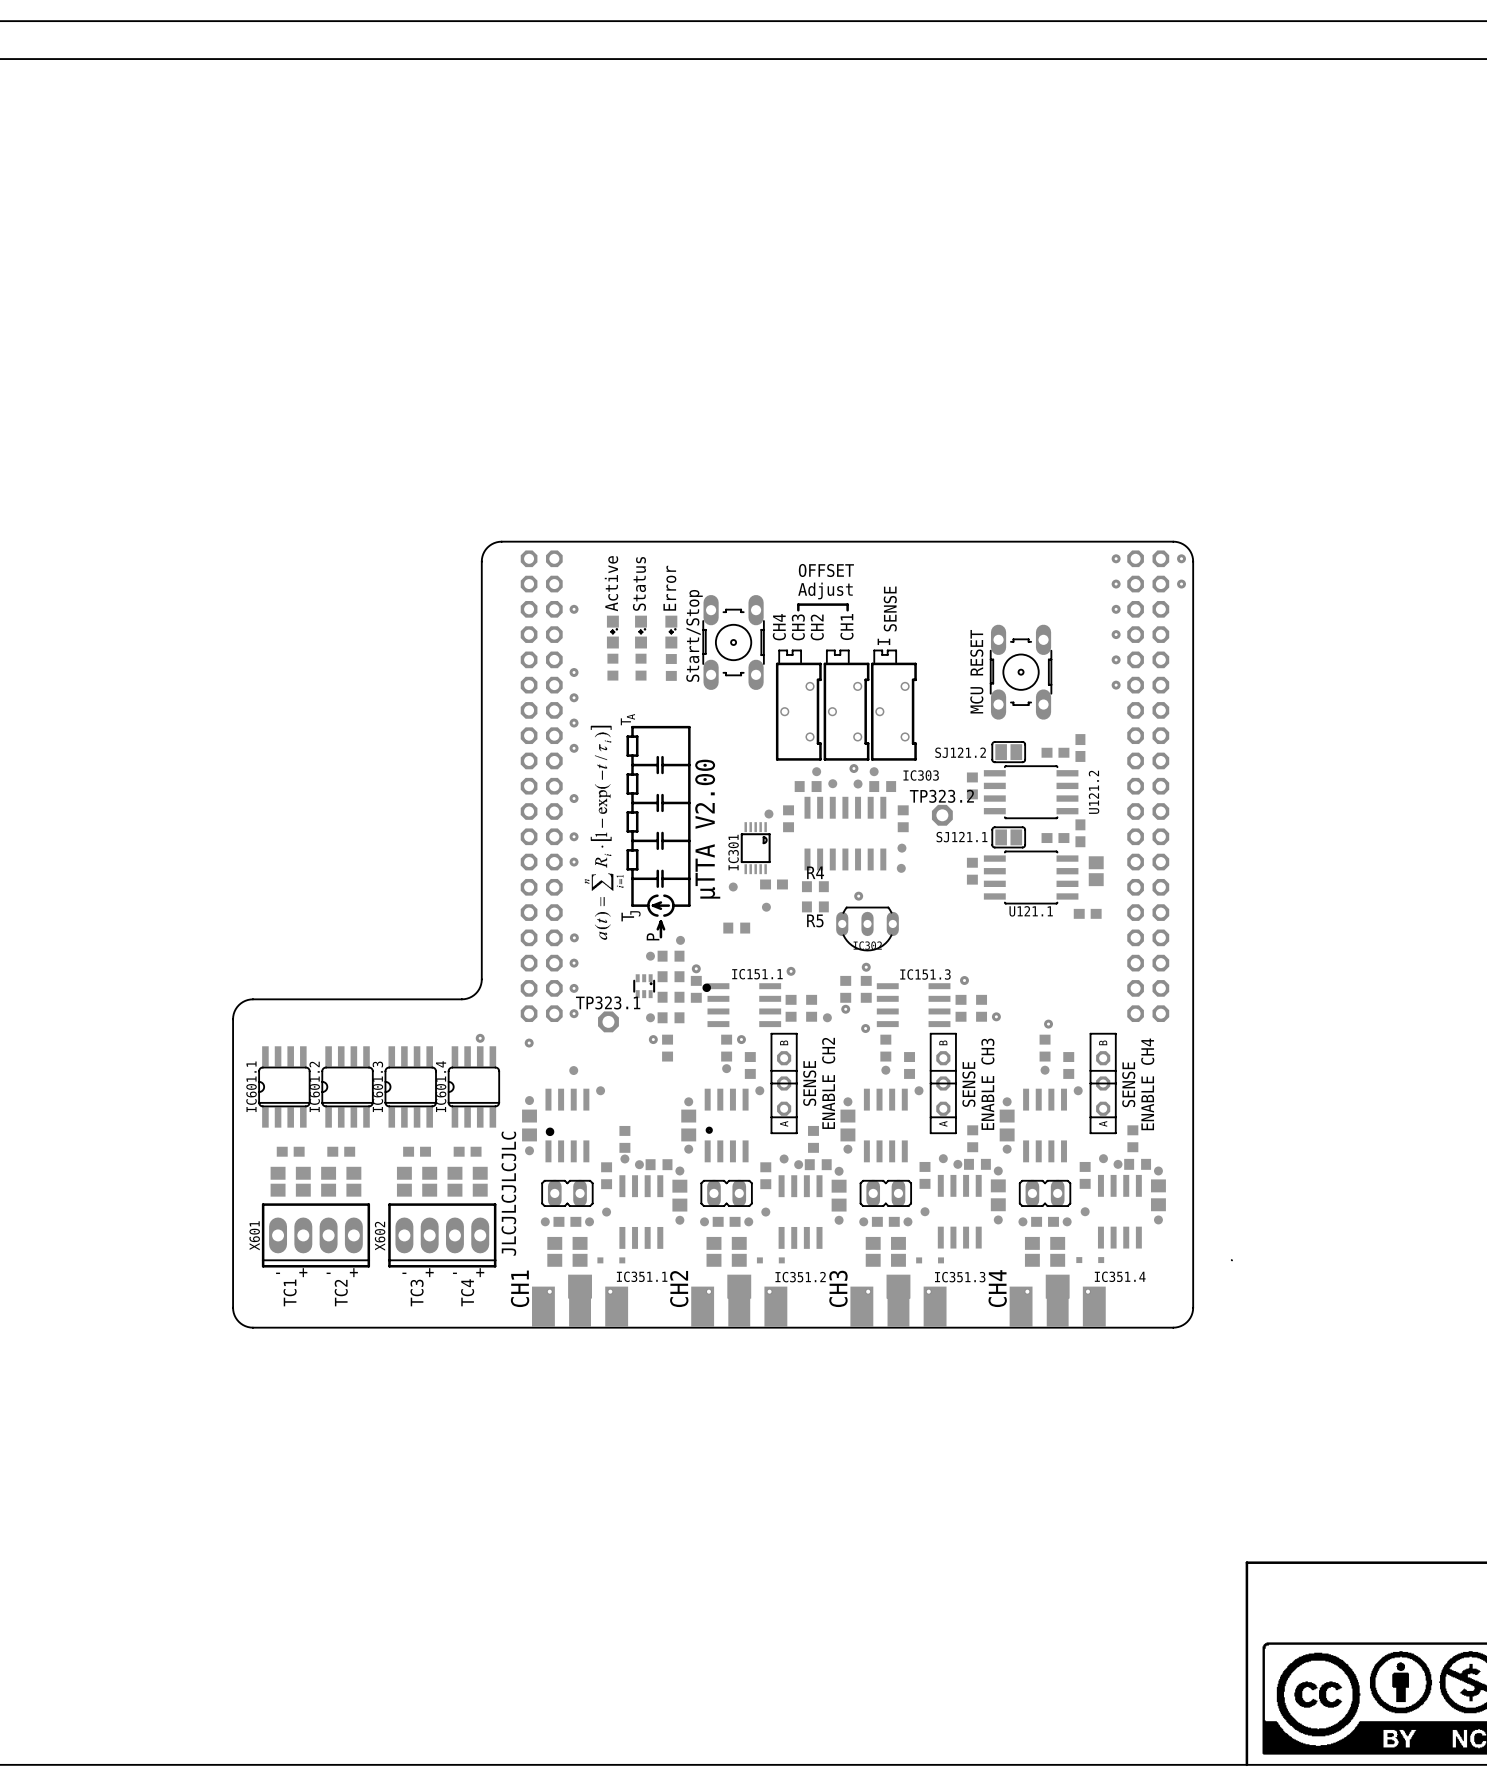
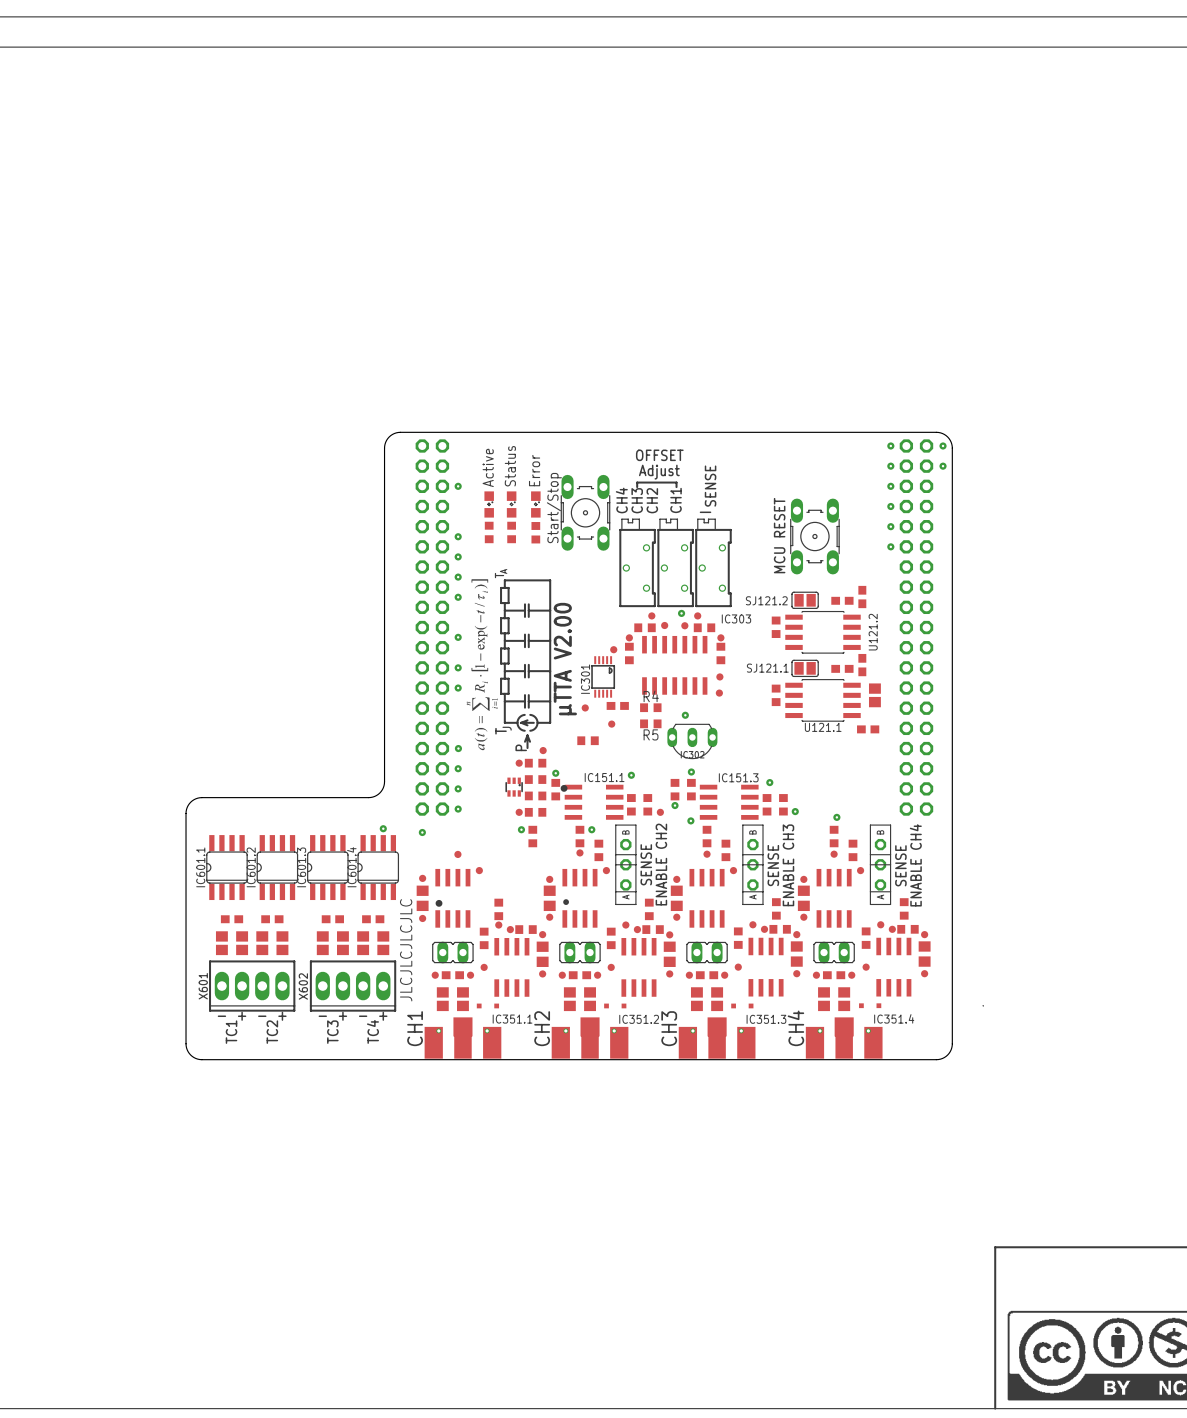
part: none -> (629, 637)
part: none -> (720, 637)
TP323.2: (942, 815) -> none
TP323.1: (608, 1021) -> none

